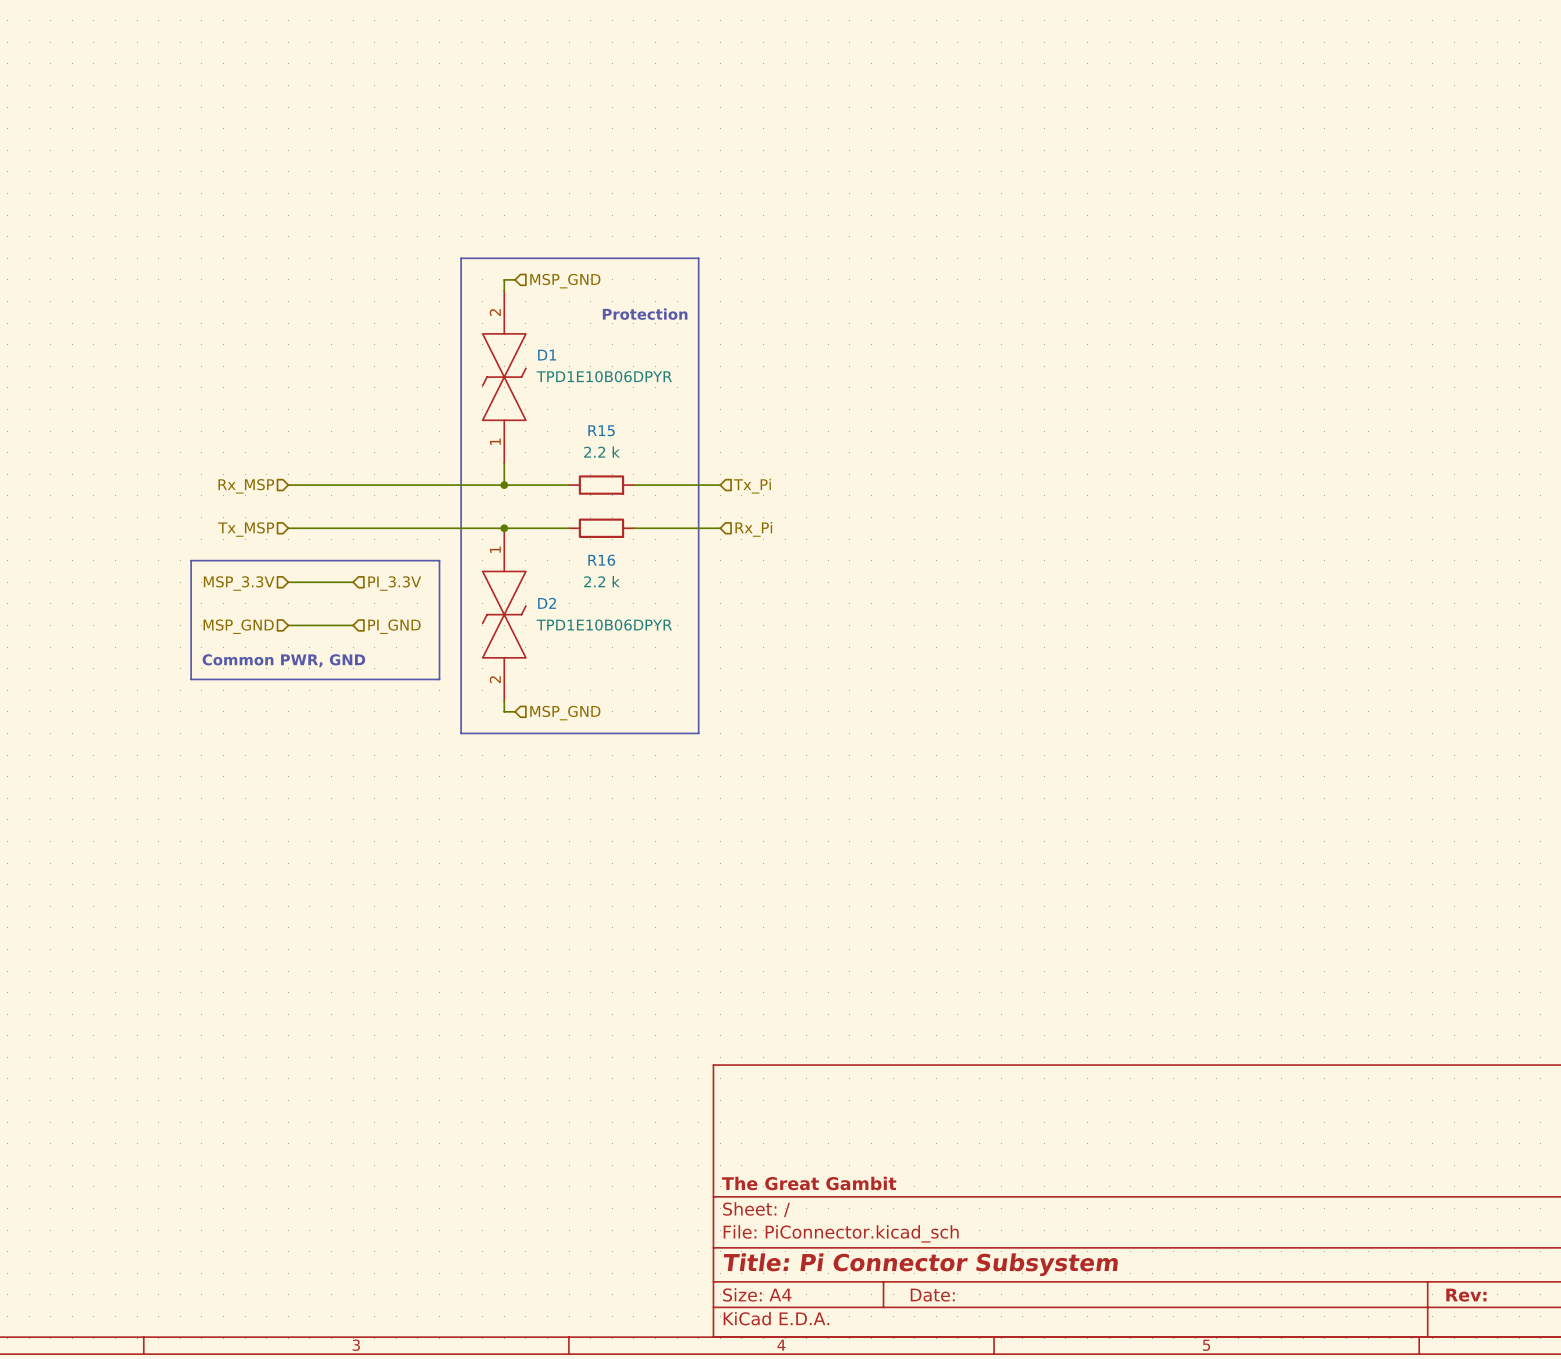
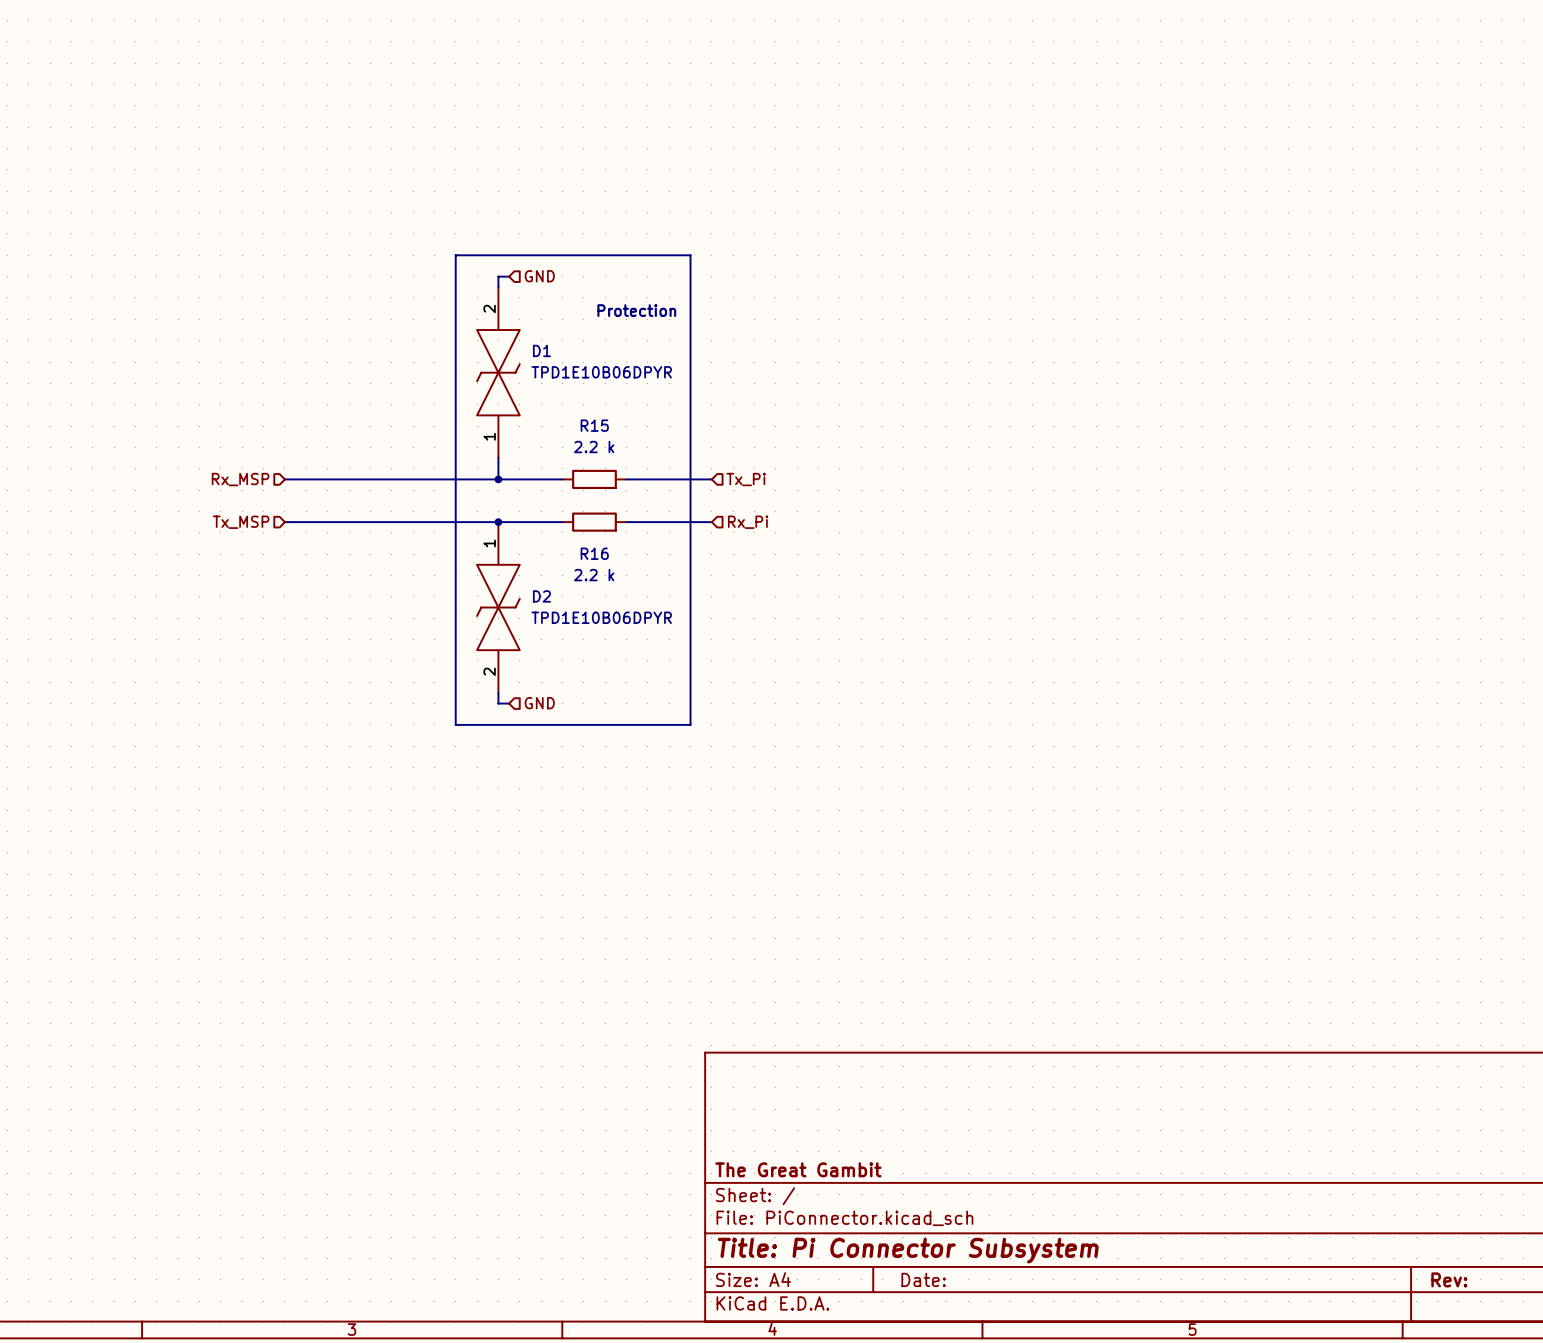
hierarchical label: MSP_GND (565, 281) -> GND (539, 276)
line: (191, 560) (439, 560) (439, 679) (191, 679) (191, 560) -> none
wire: (288, 582) (353, 582) -> none
hierarchical label: MSP_3.3V (239, 583) -> none
hierarchical label: PI_3.3V (394, 583) -> none
wire: (288, 625) (353, 625) -> none
hierarchical label: MSP_GND (238, 626) -> none
hierarchical label: PI_GND (394, 626) -> none
text: Common PWR, GND (283, 660) -> none
hierarchical label: MSP_GND (565, 713) -> GND (539, 703)

